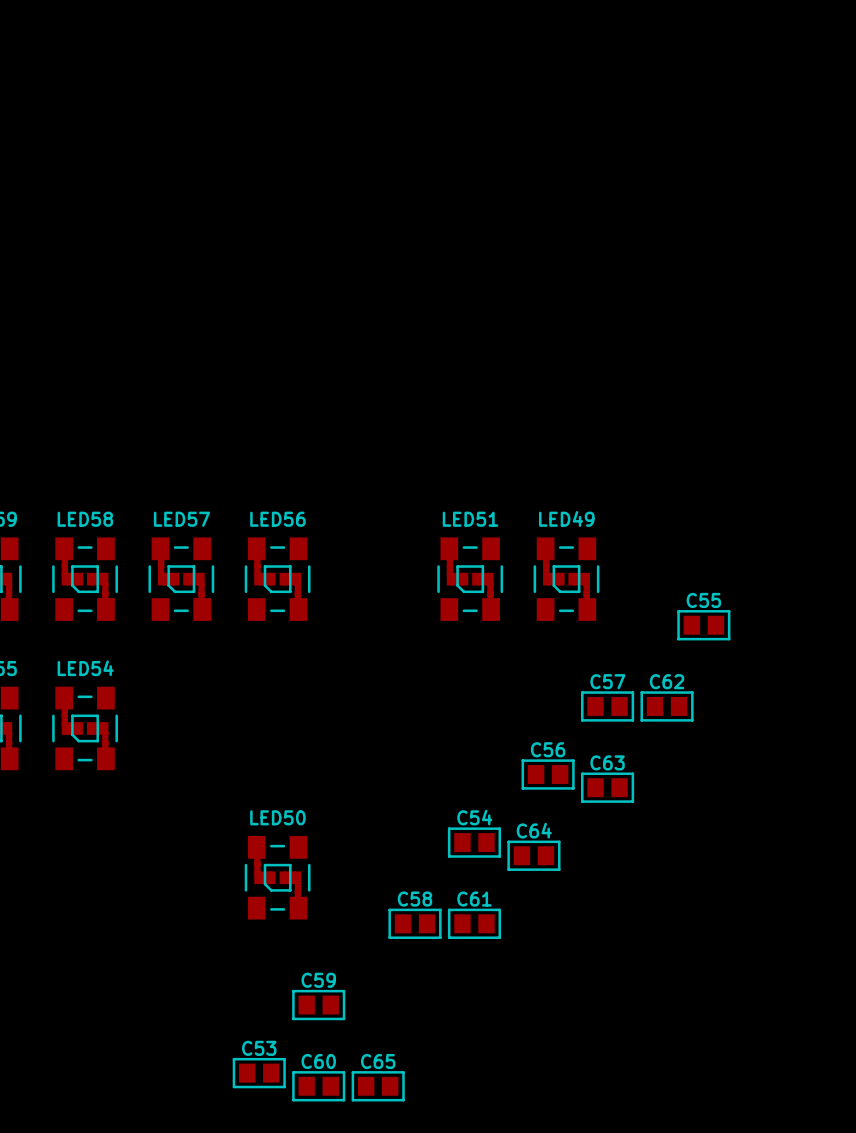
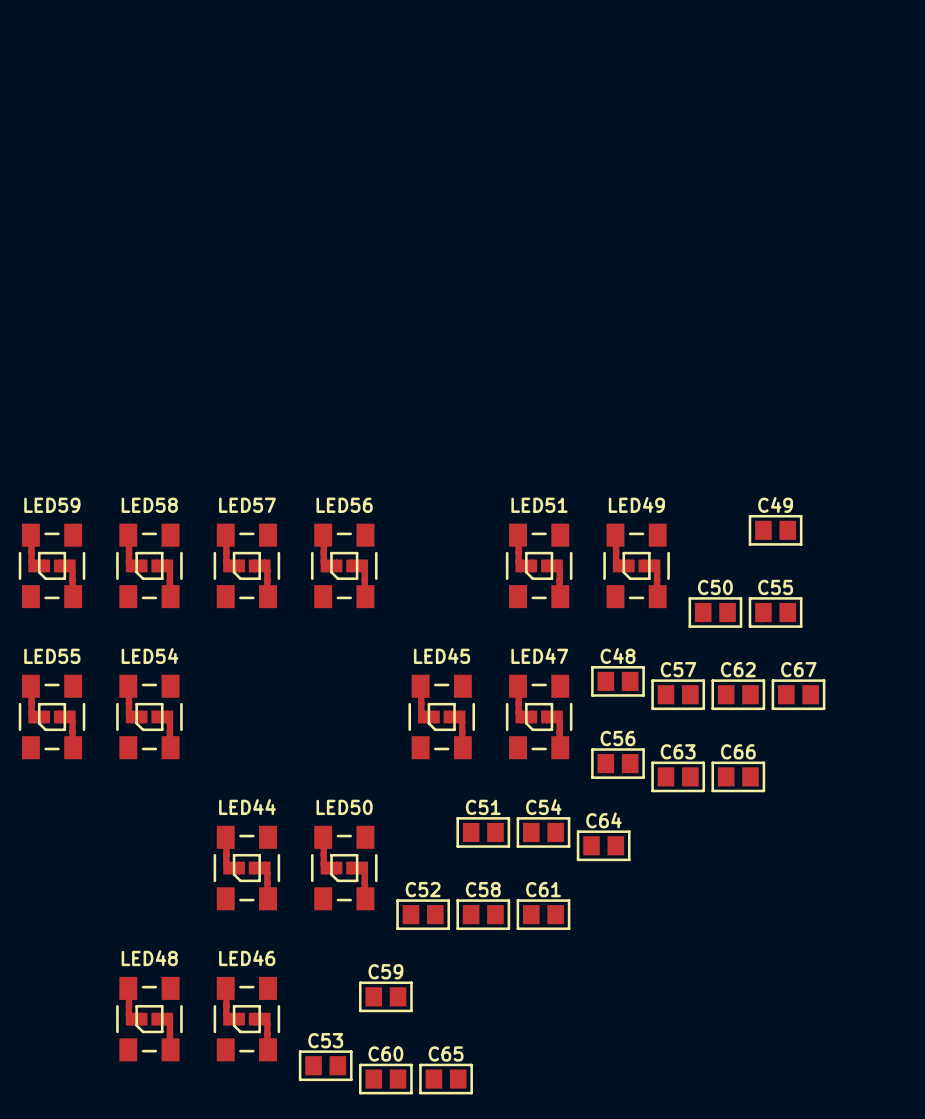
C49: none -> (775, 530)
C50: none -> (715, 612)
C48: none -> (617, 681)
C67: none -> (798, 694)
LED45: none -> (441, 716)
LED47: none -> (539, 716)
C66: none -> (738, 776)
C51: none -> (483, 832)
LED44: none -> (246, 868)
C52: none -> (423, 914)
LED48: none -> (149, 1019)
LED46: none -> (246, 1019)

